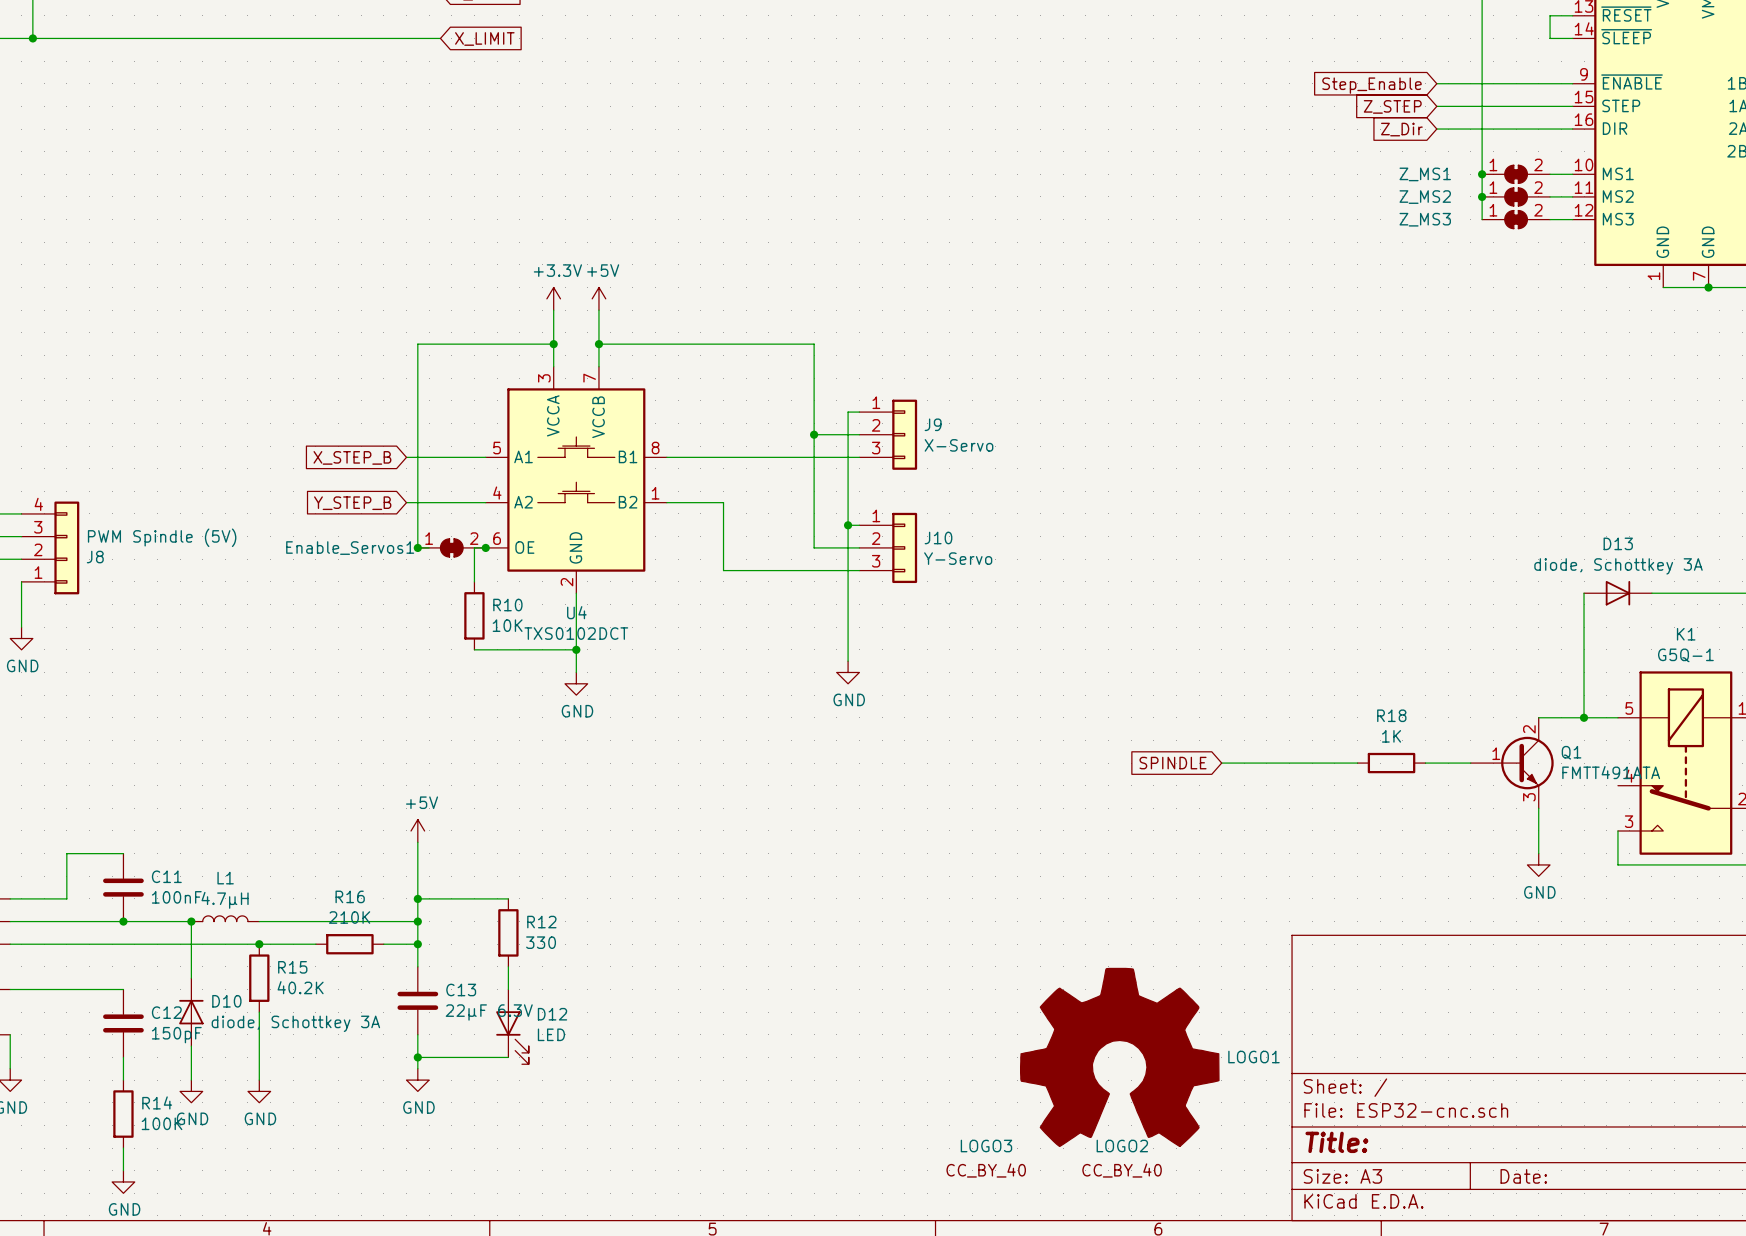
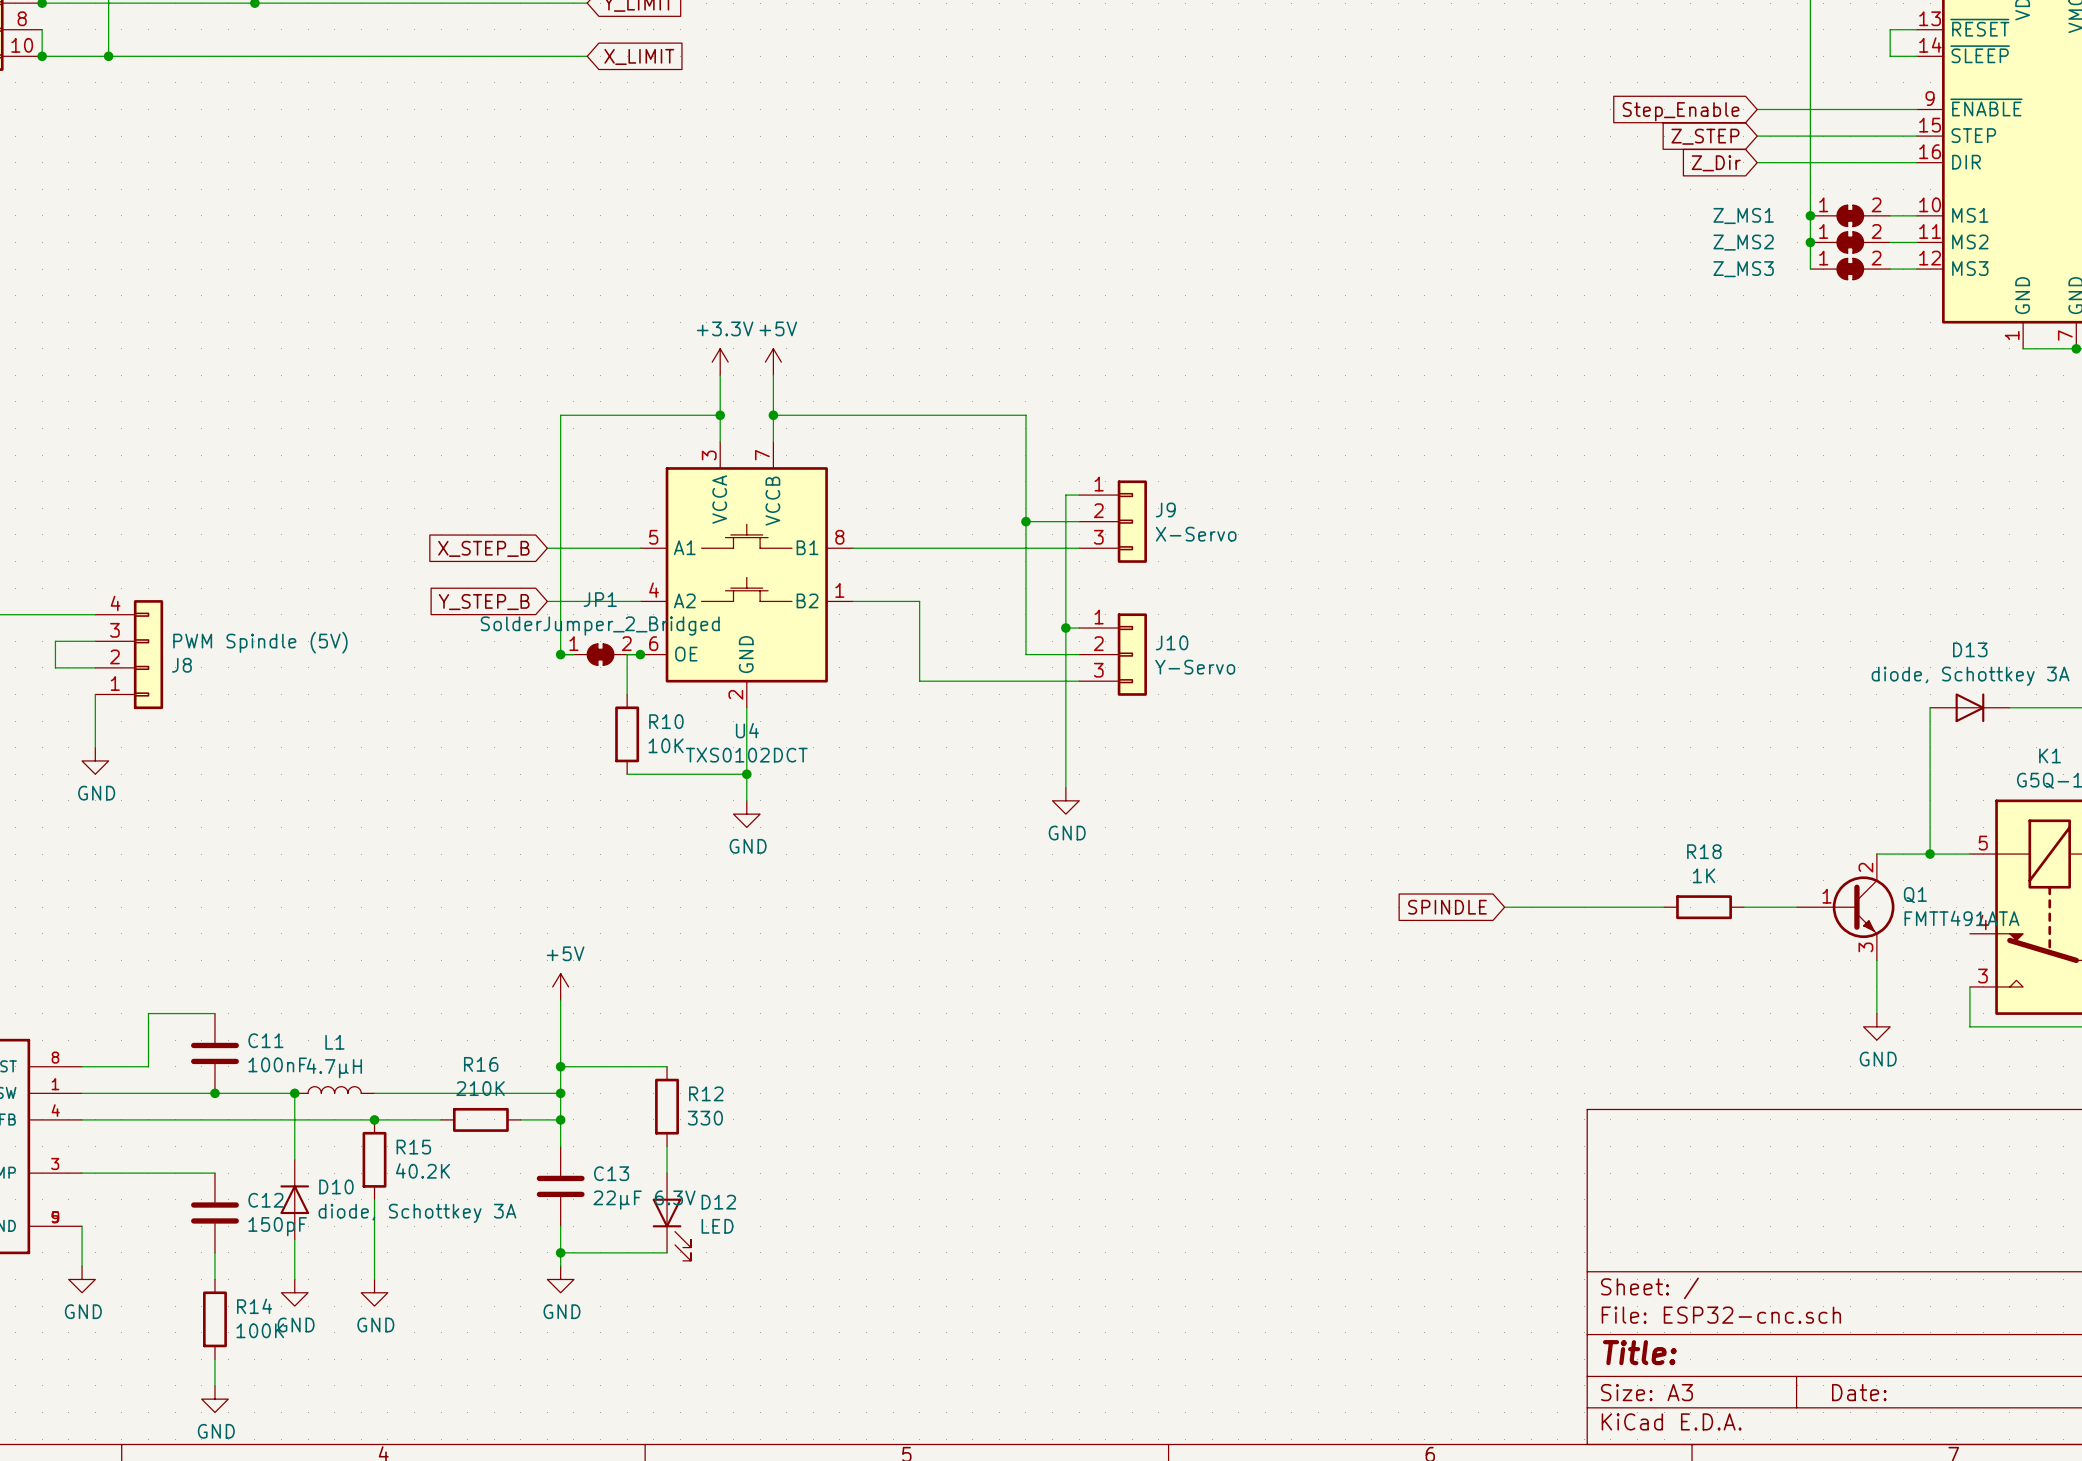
Enable_Servos1 value: none -> SolderJumper_2_Bridged (600, 626)
Enable_Servos1 name: Enable_Servos1 (350, 548) -> JP1 (600, 599)
LOGO1: (1119, 1057) -> none
LOGO3: (986, 1158) -> none
LOGO2: (1122, 1158) -> none

